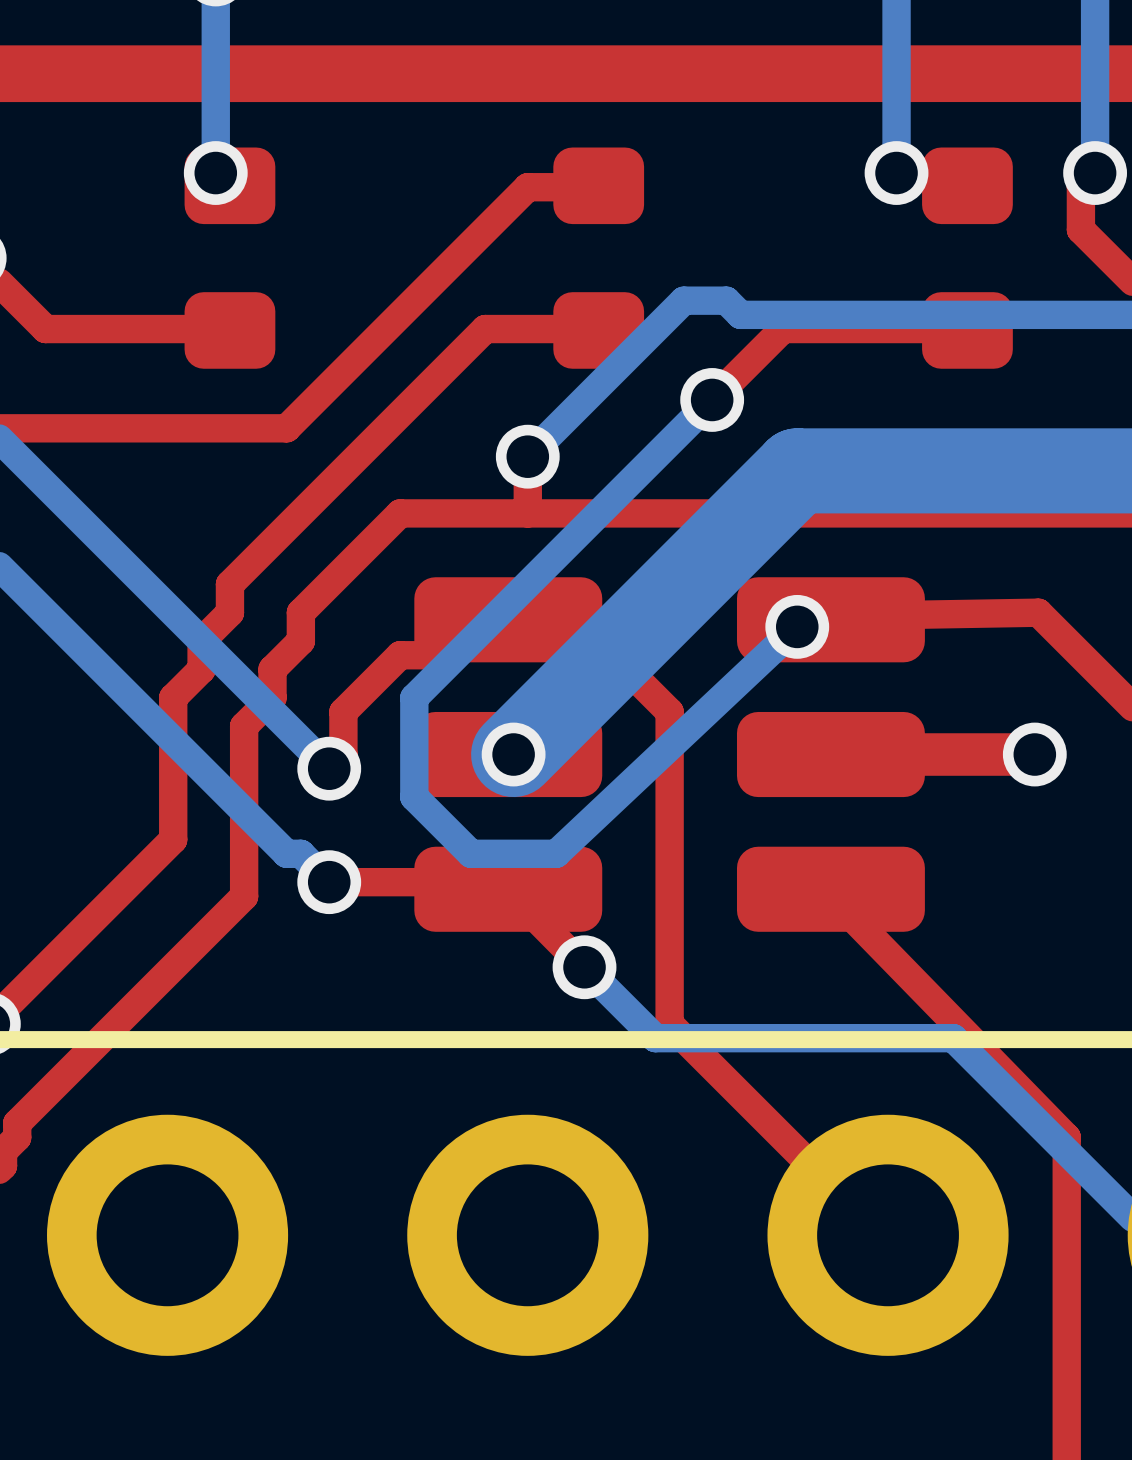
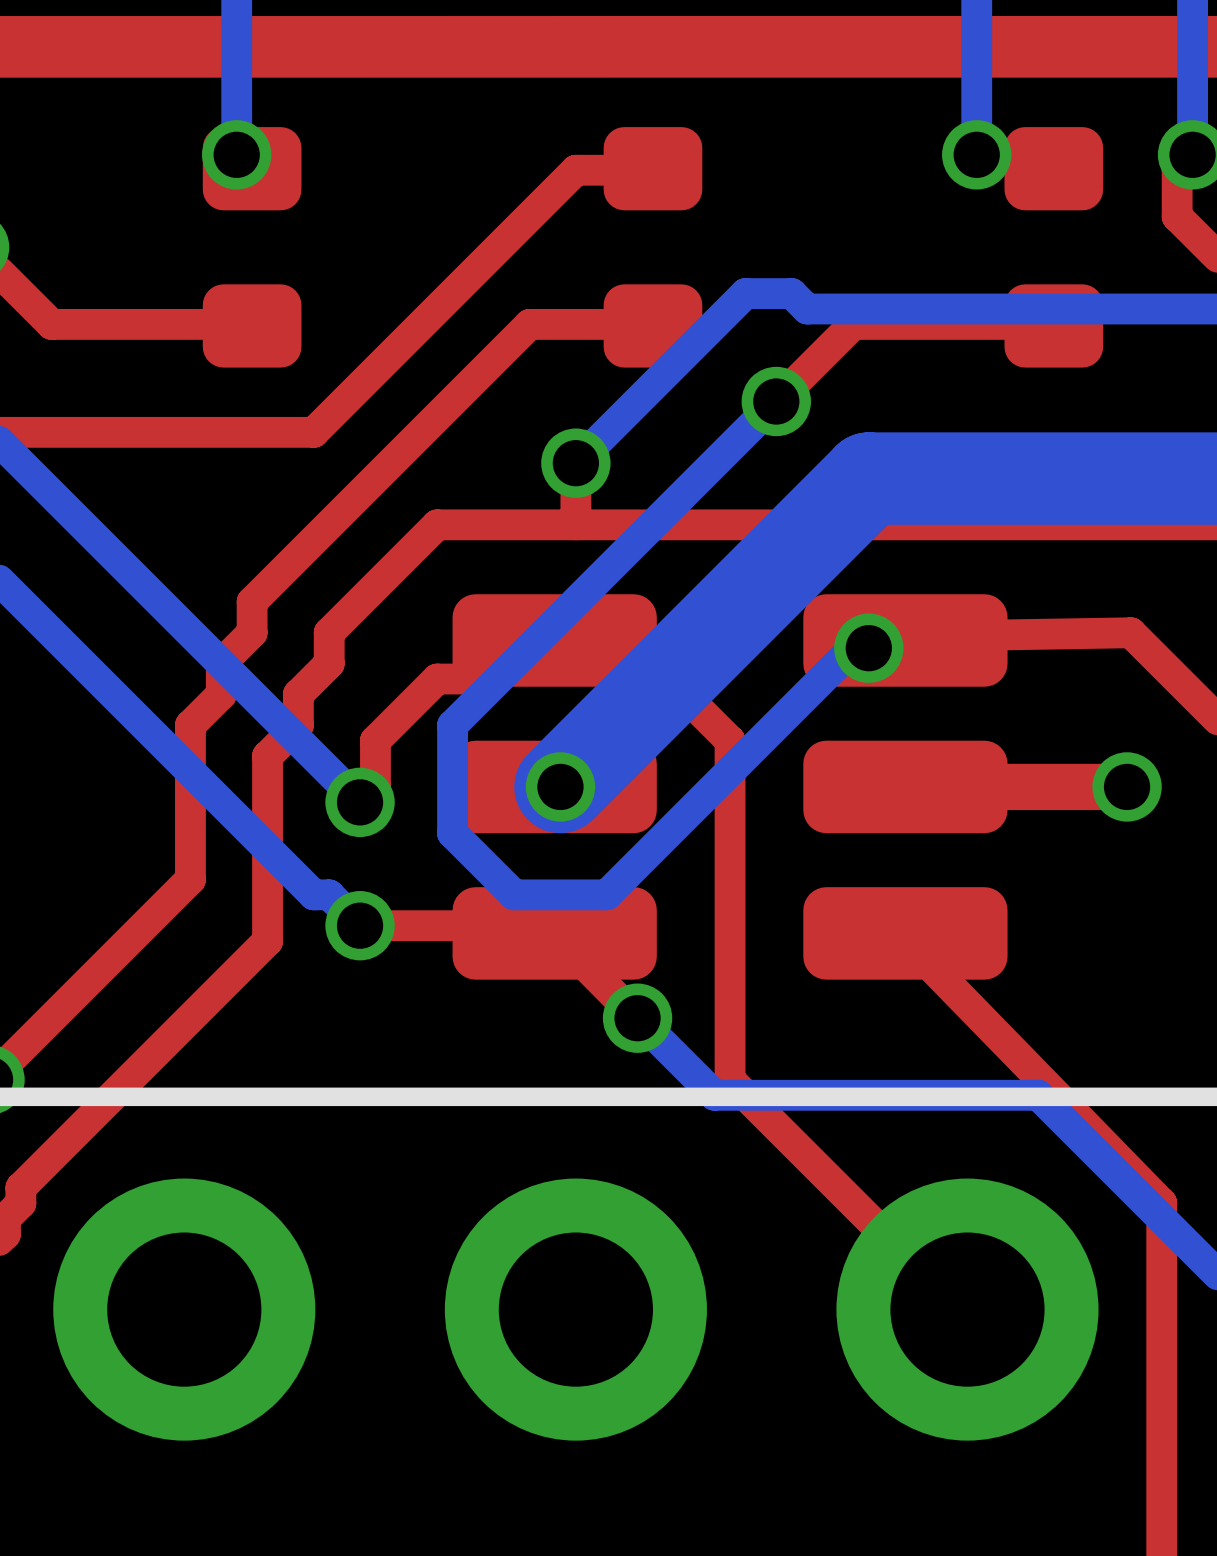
bottom track: (797, 626) (556, 853) -> (853, 648) (606, 894)

